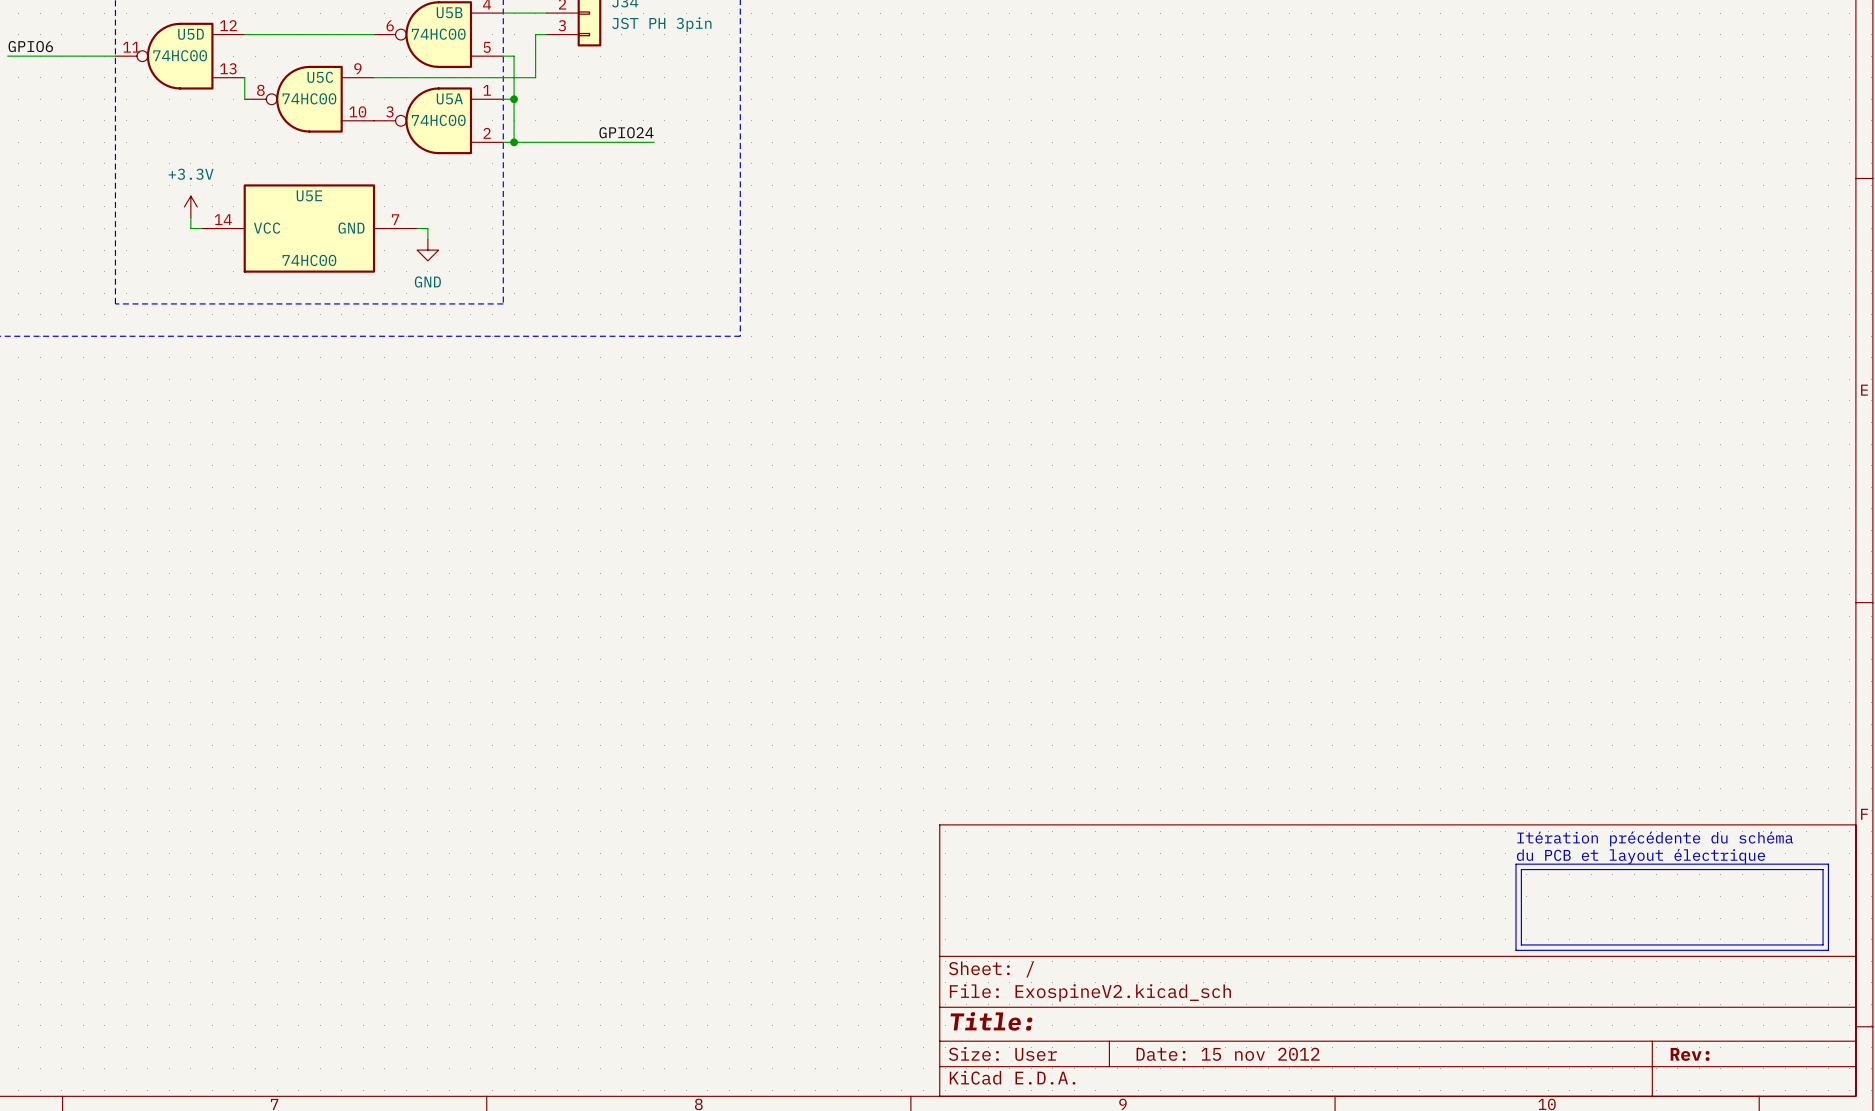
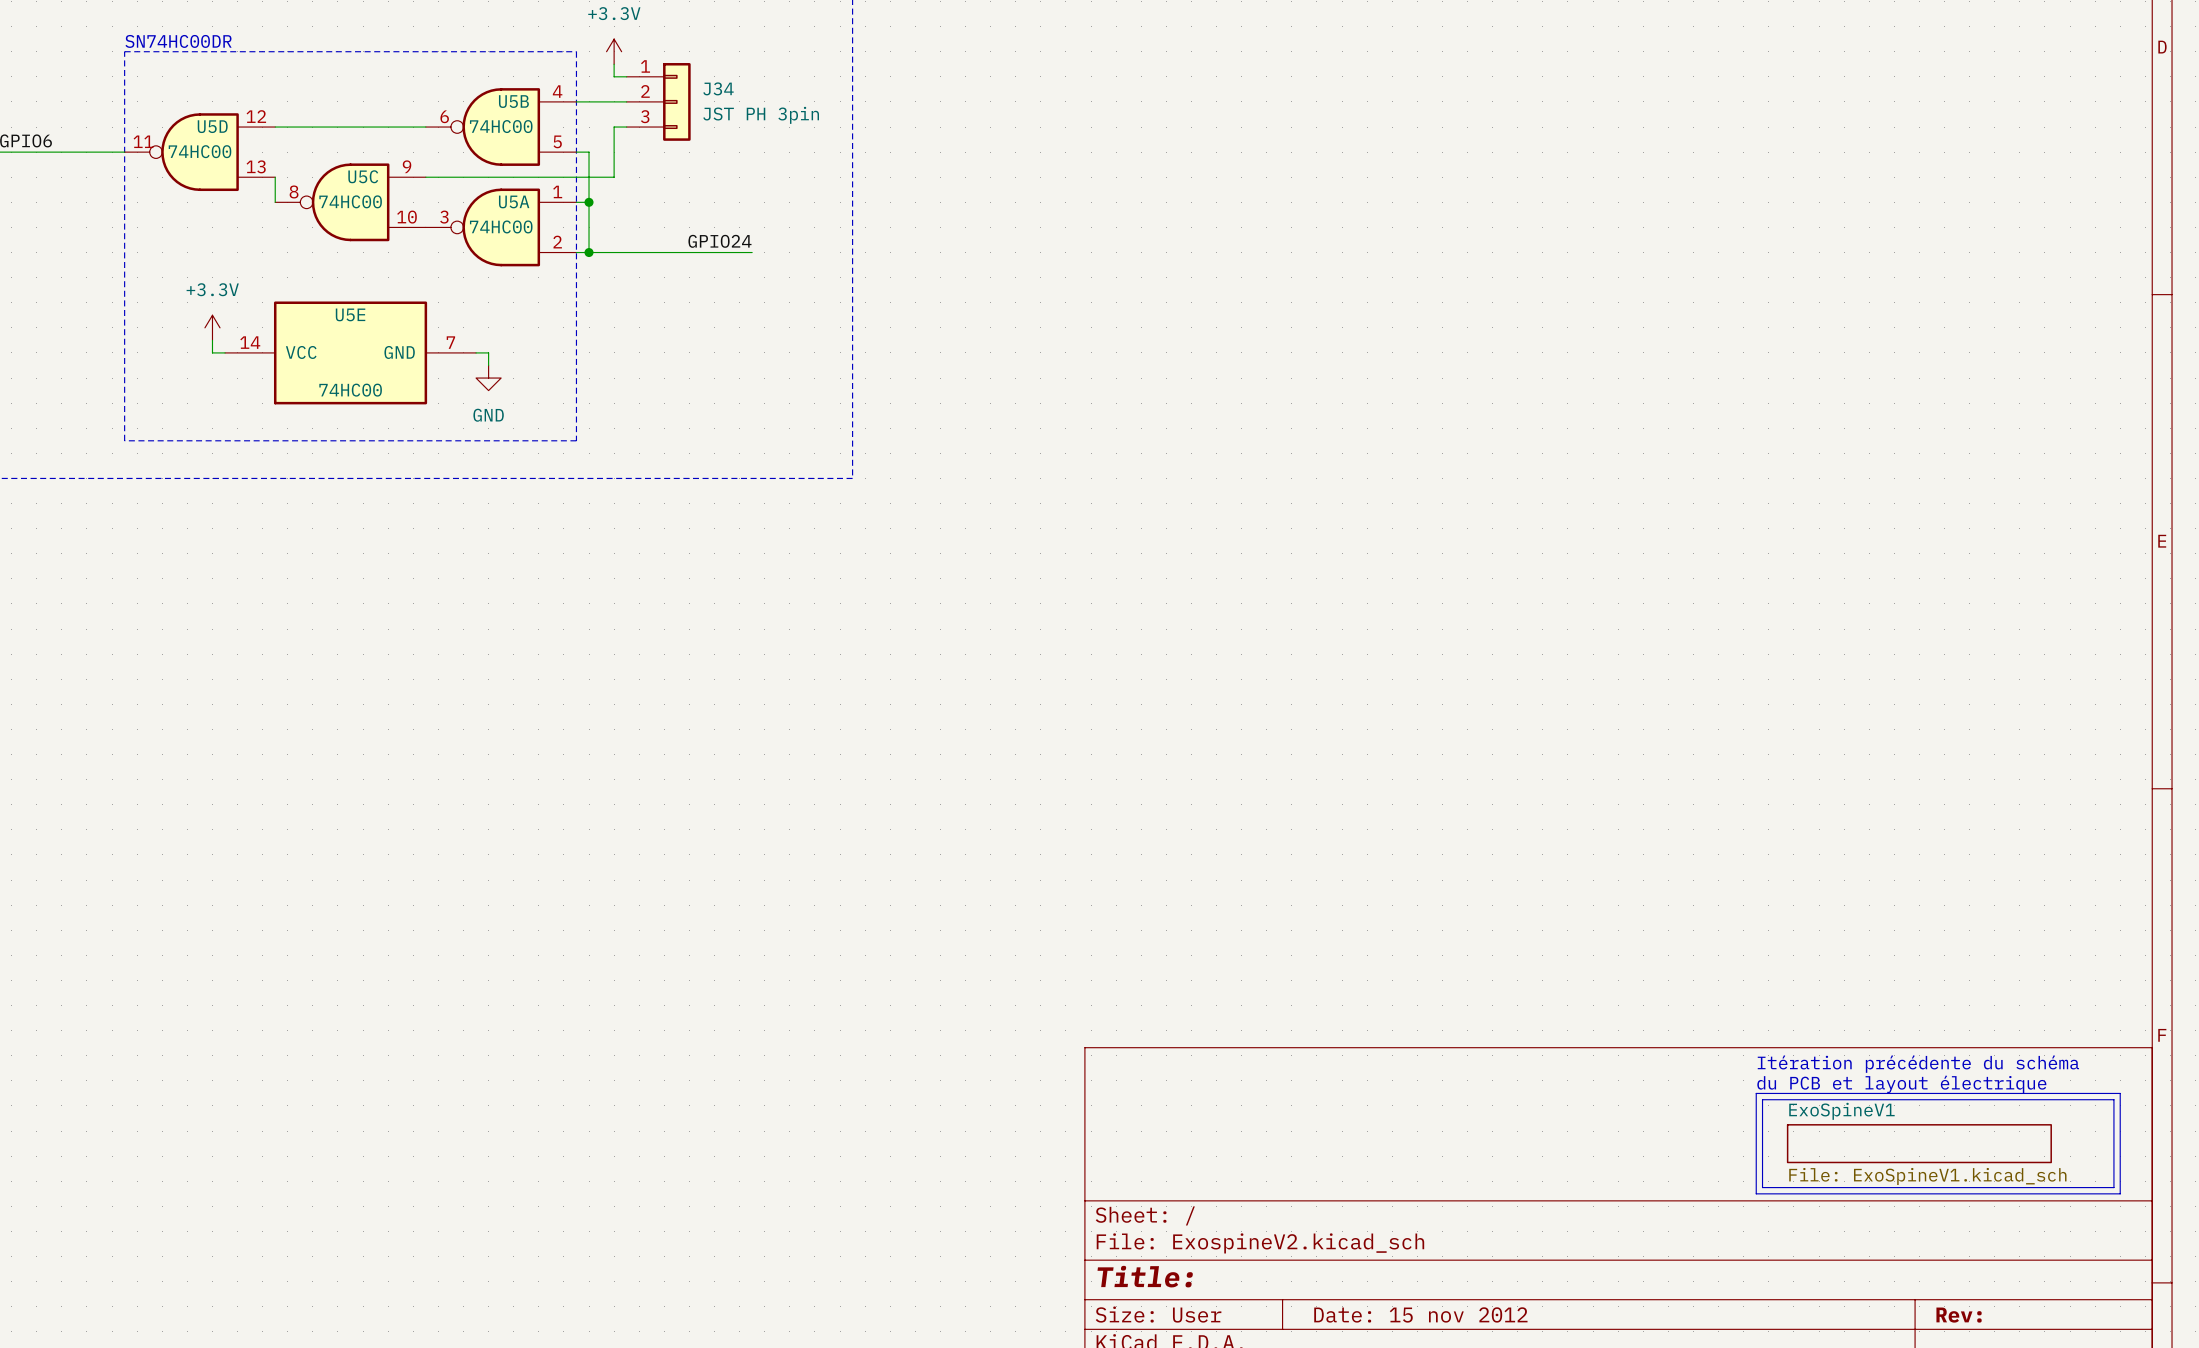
sheet ExoSpineV1: none -> File: ExoSpineV1.kicad_sch (1919, 1143)

